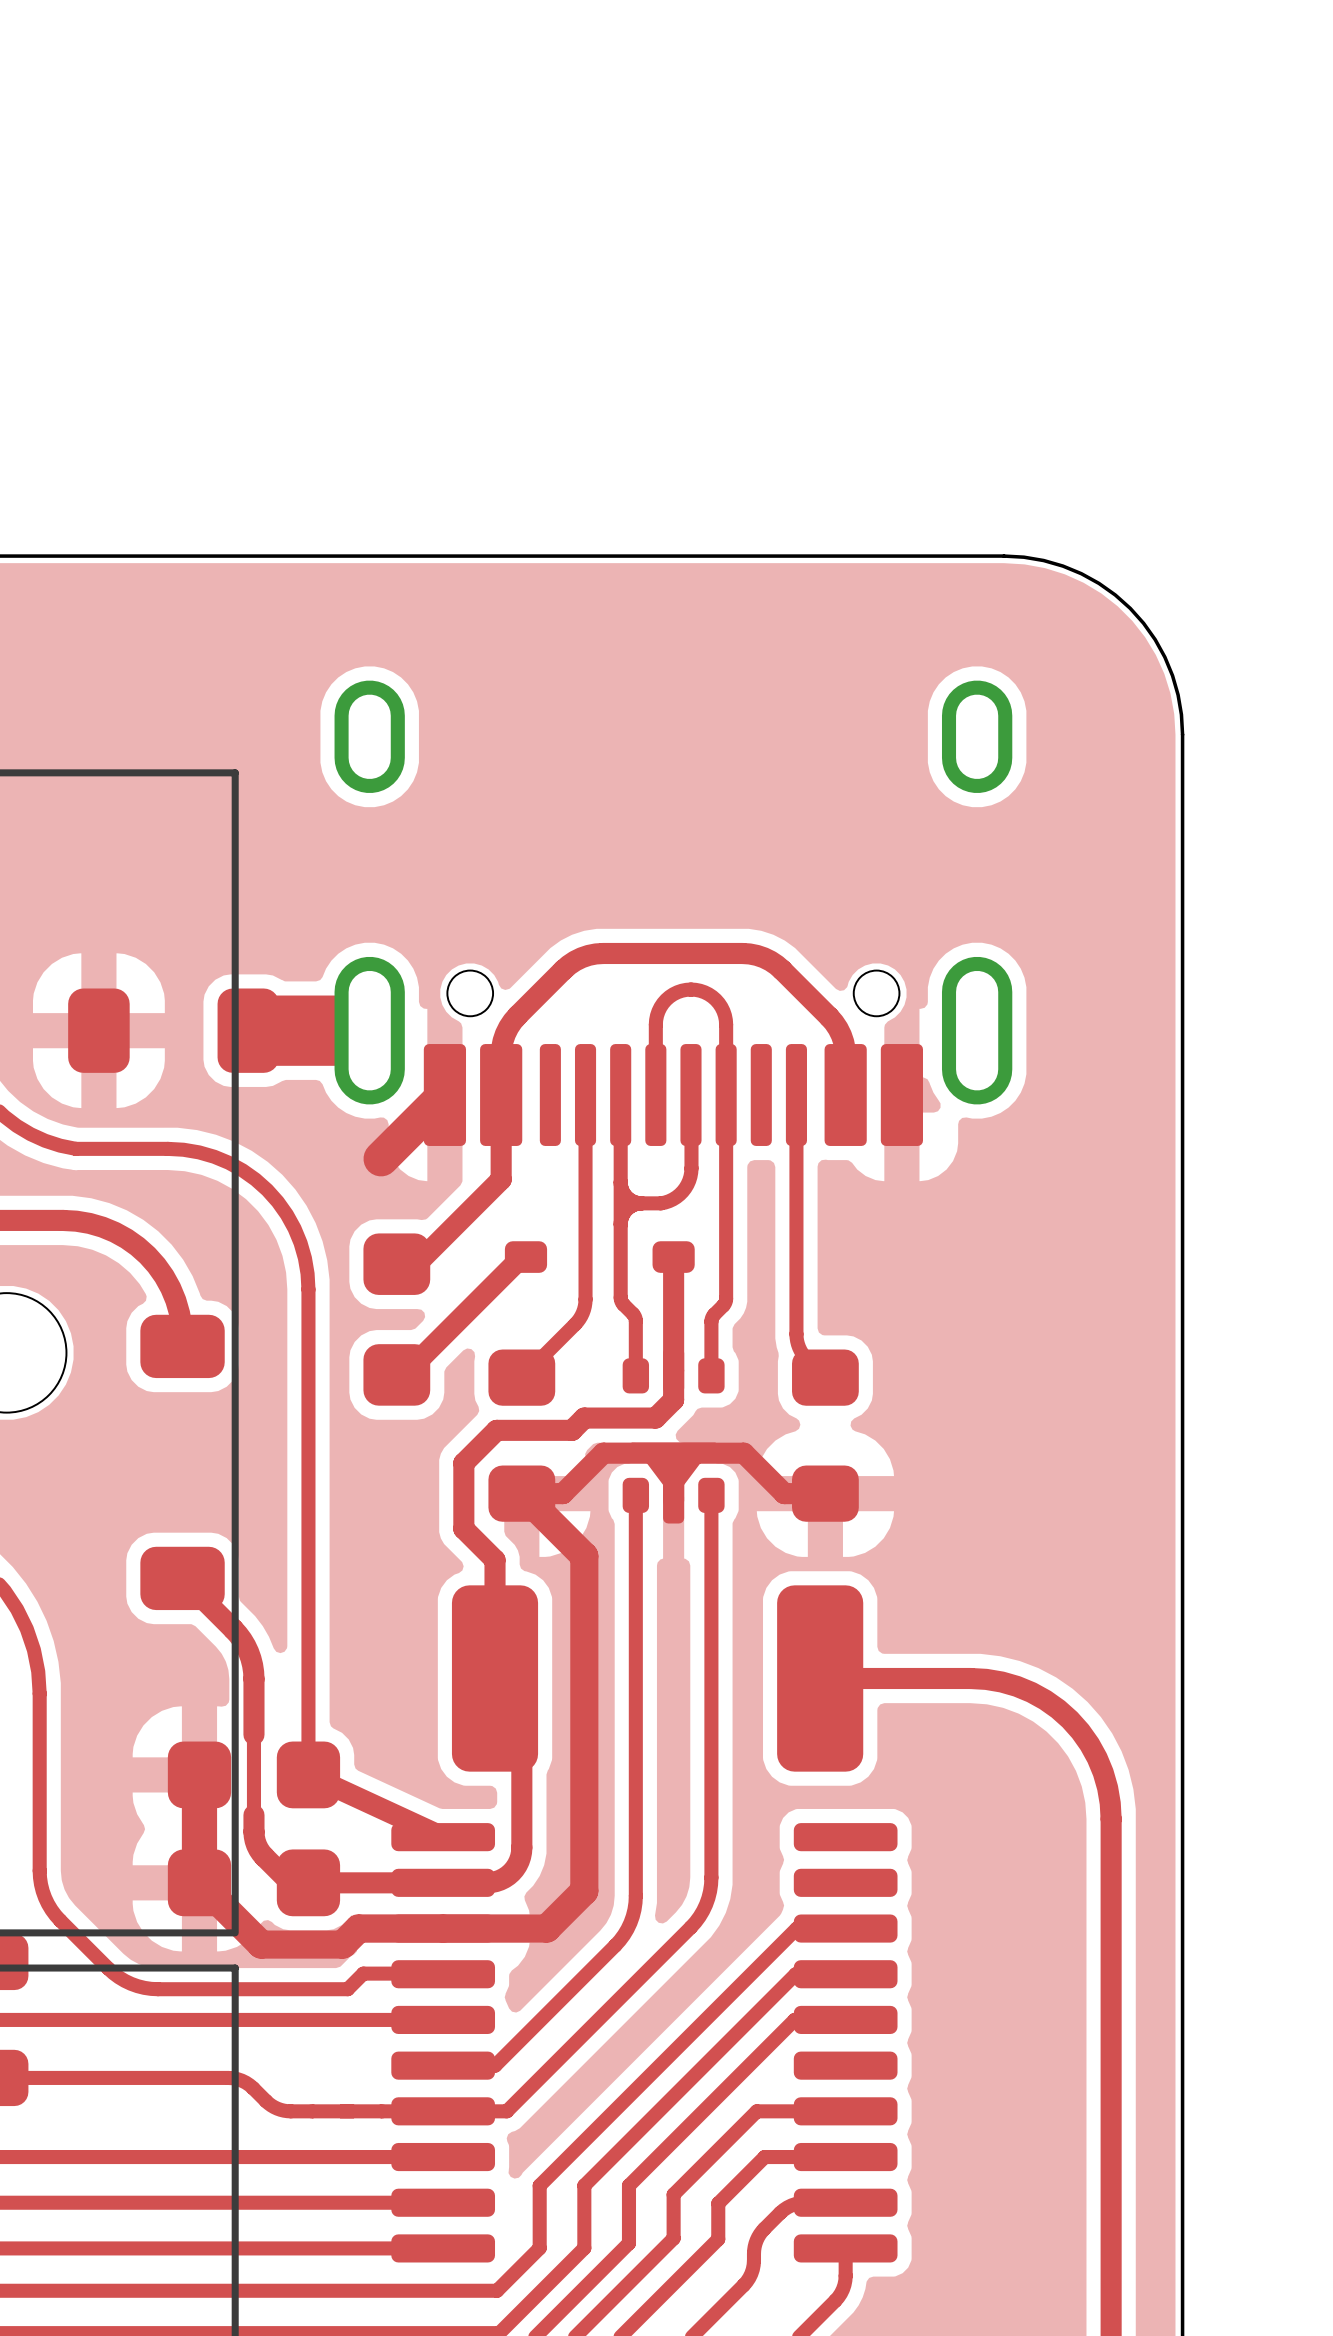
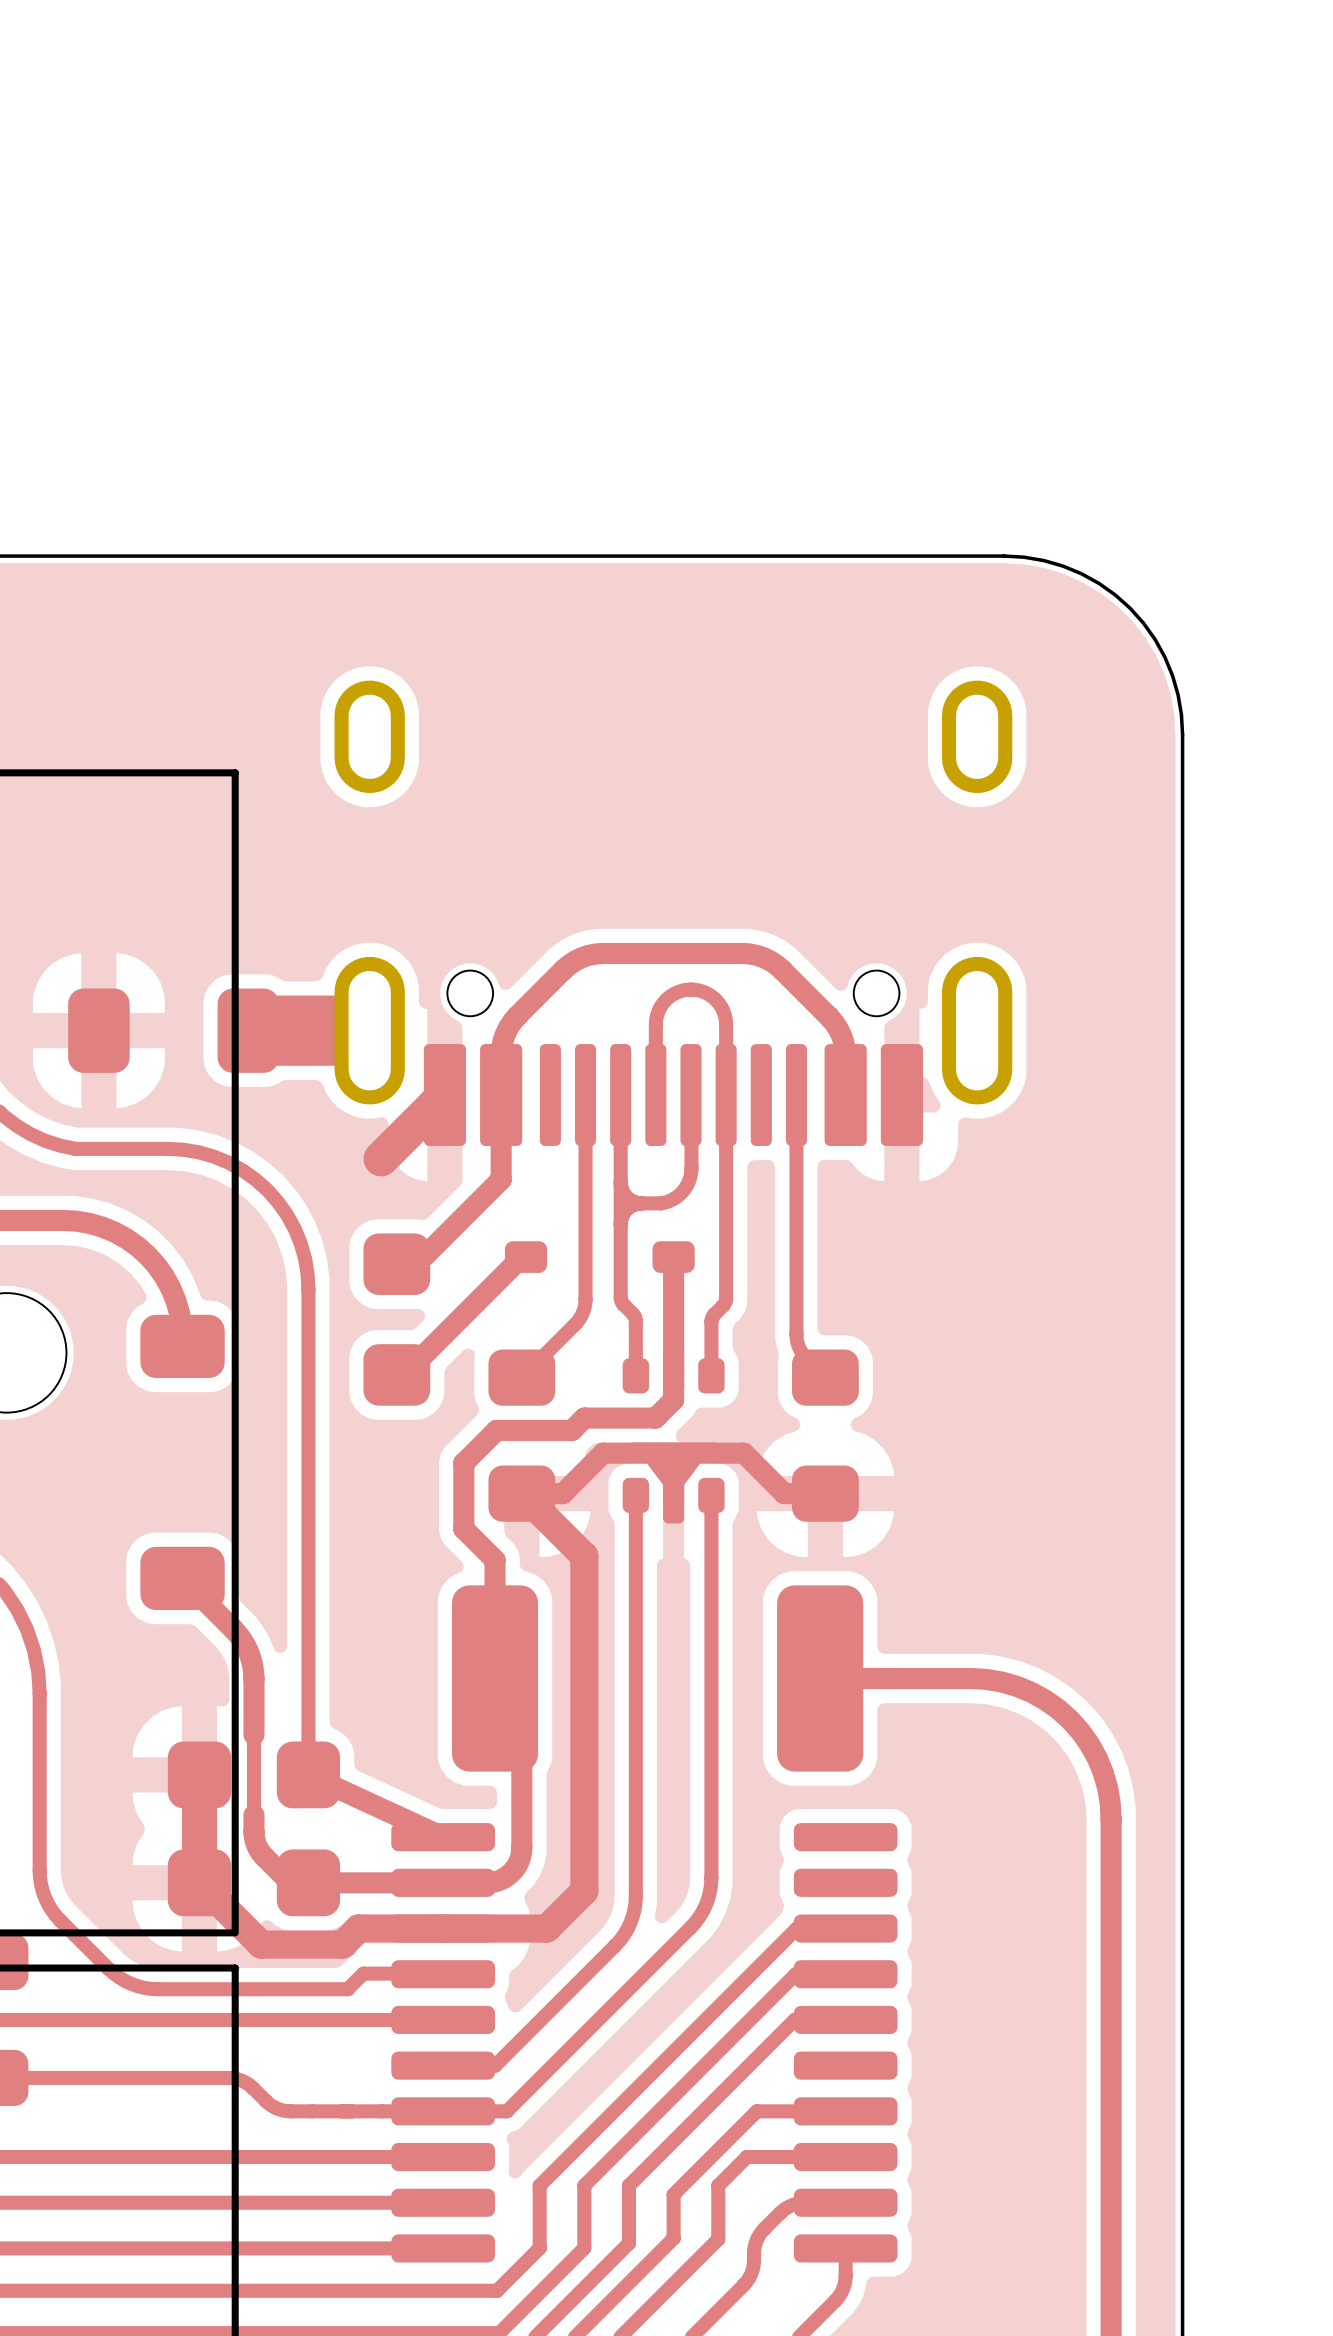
top track: (764, 2157) (718, 2203) -> (764, 2157) (746, 2157) (718, 2185) (718, 2203)

